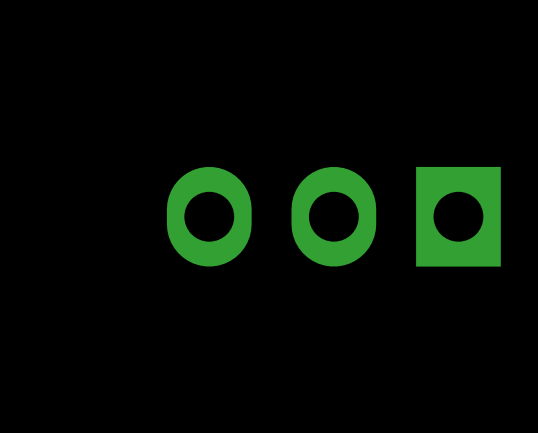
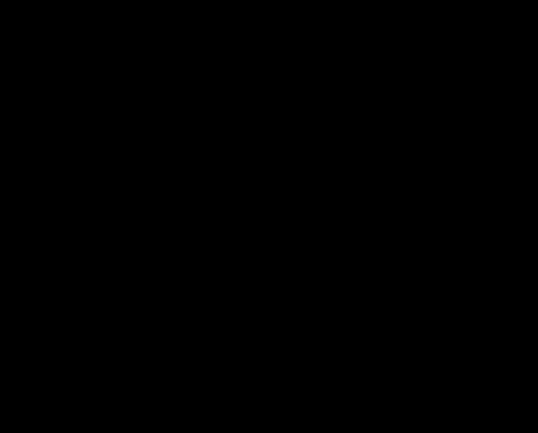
part: (333, 216) -> none

